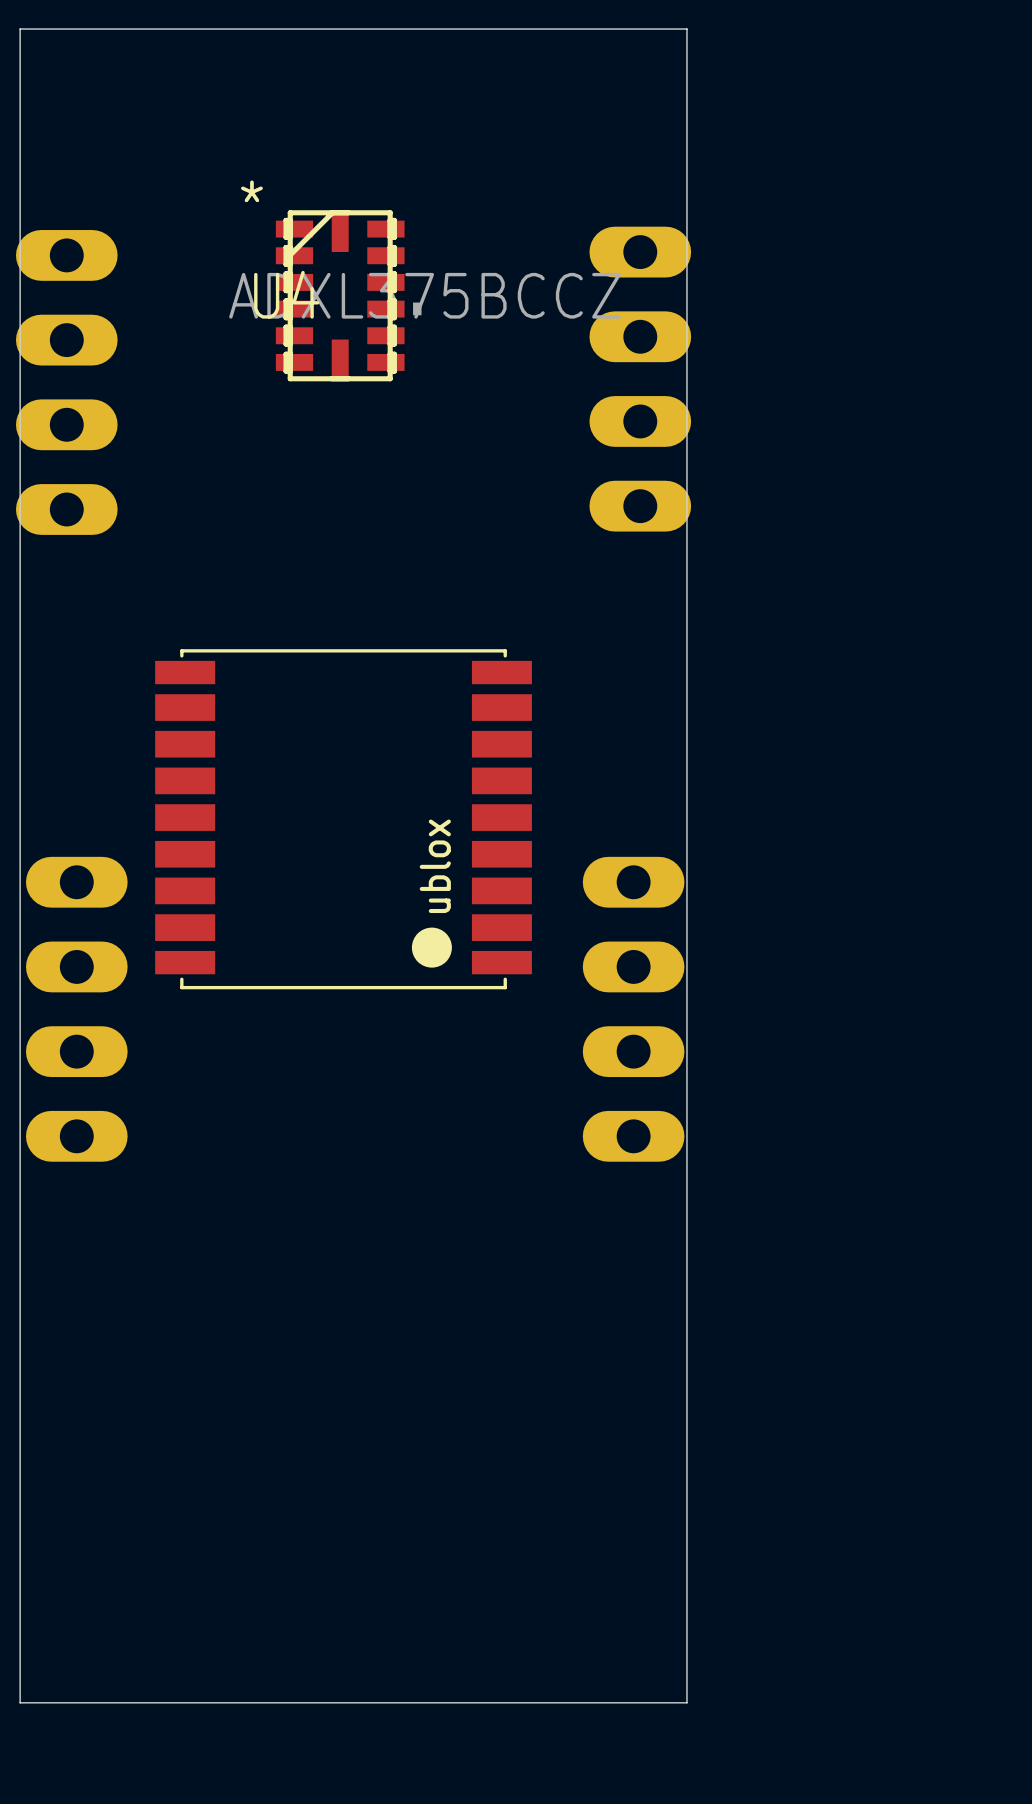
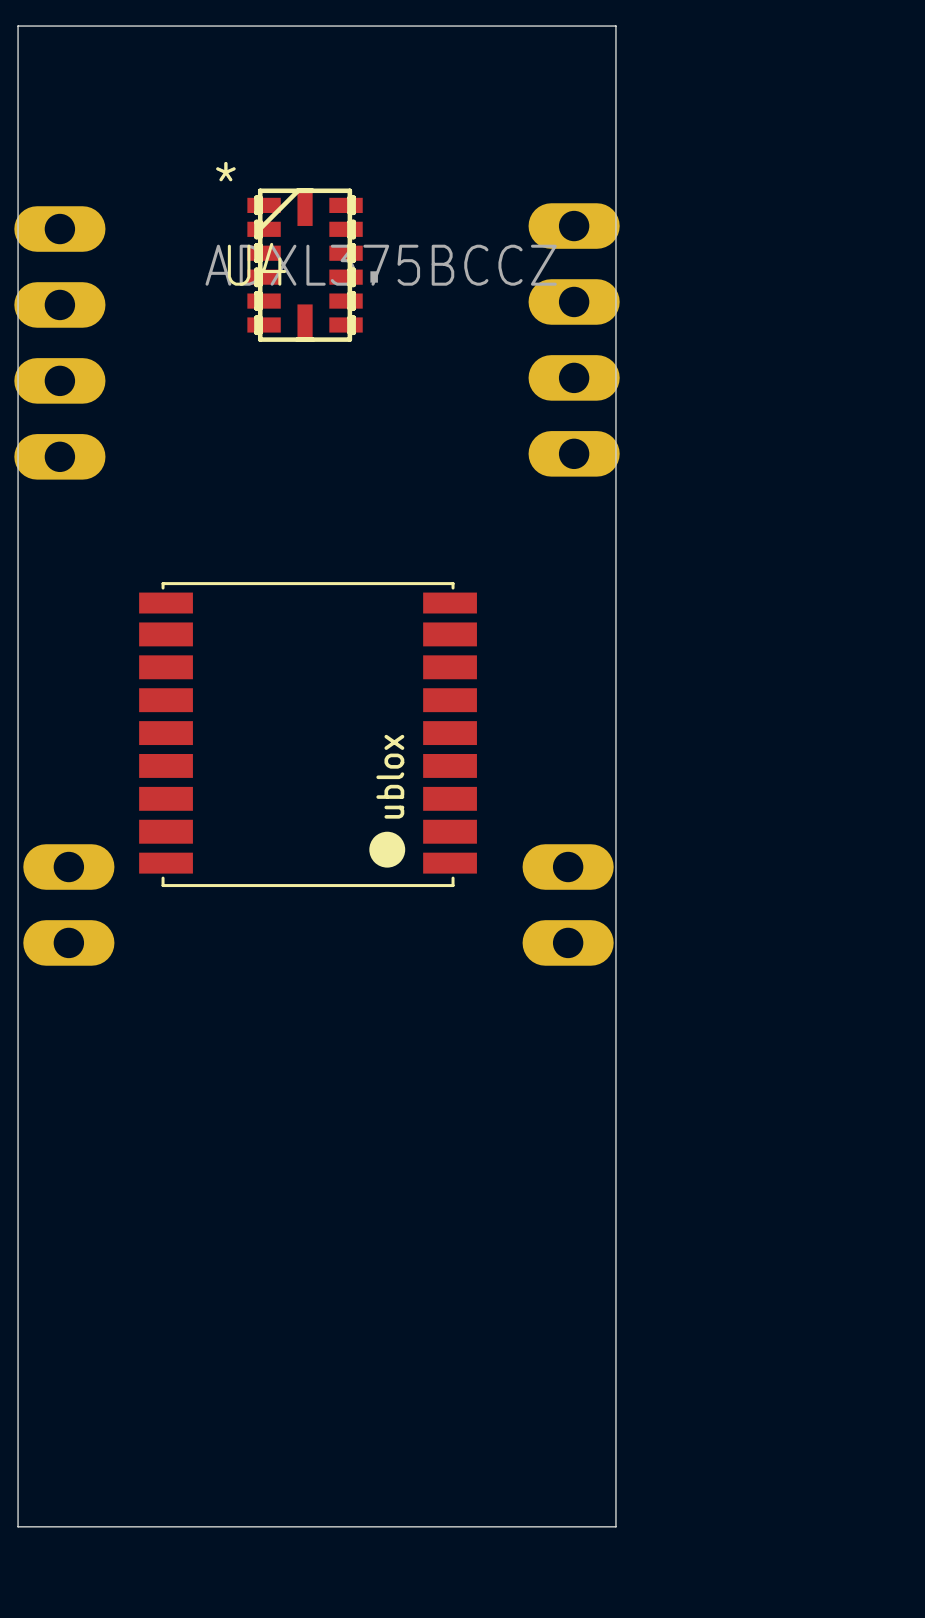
part footprint: [25, 856, 128, 1162] -> [23, 844, 115, 966]
part footprint: [582, 856, 685, 1162] -> [522, 844, 614, 966]

